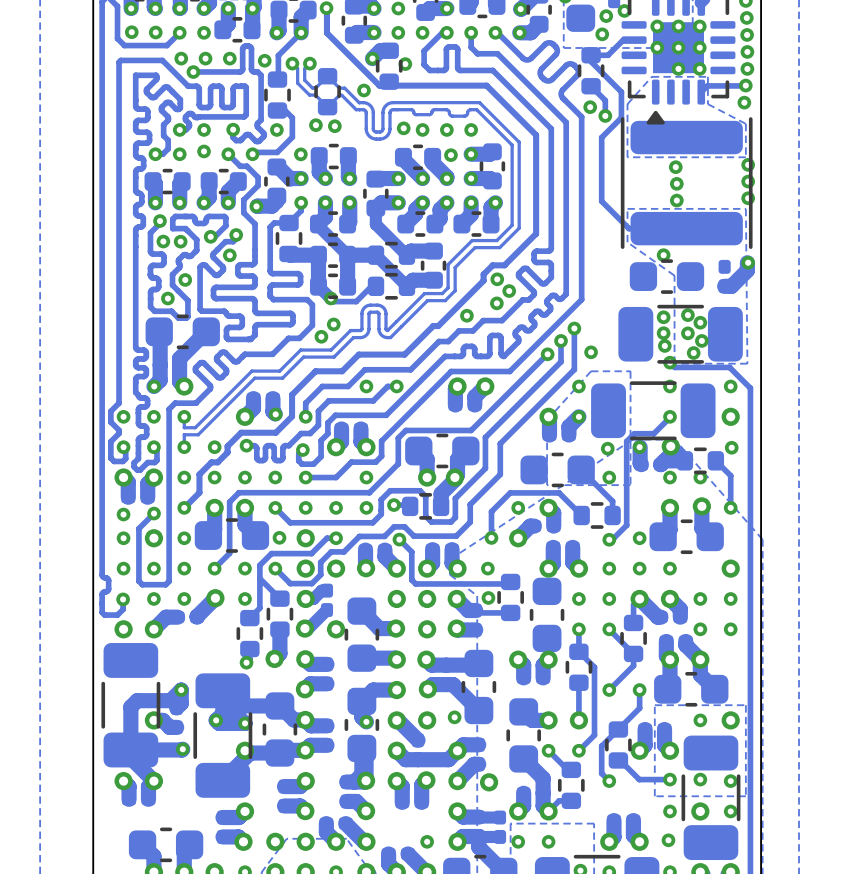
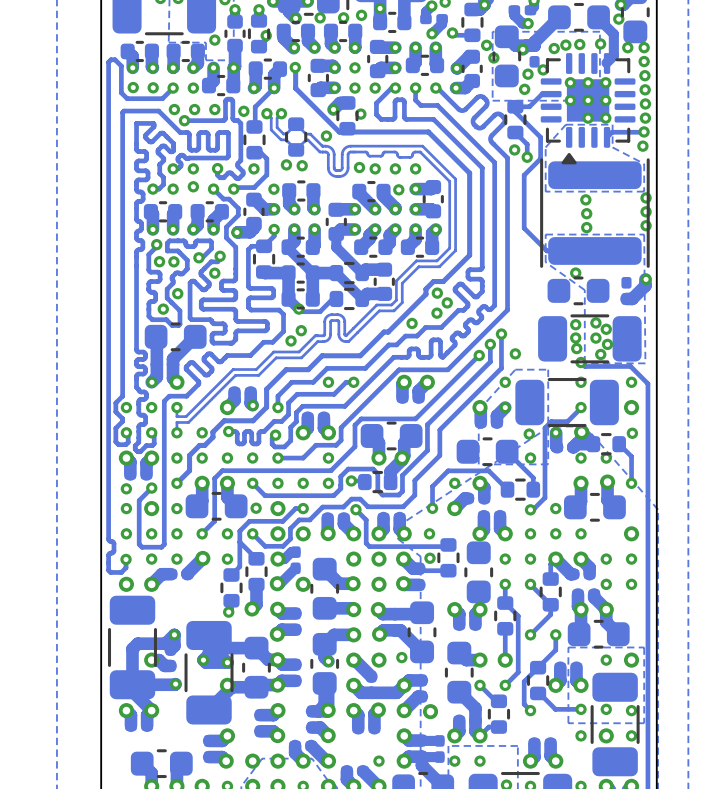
via: (668, 840) -> none

